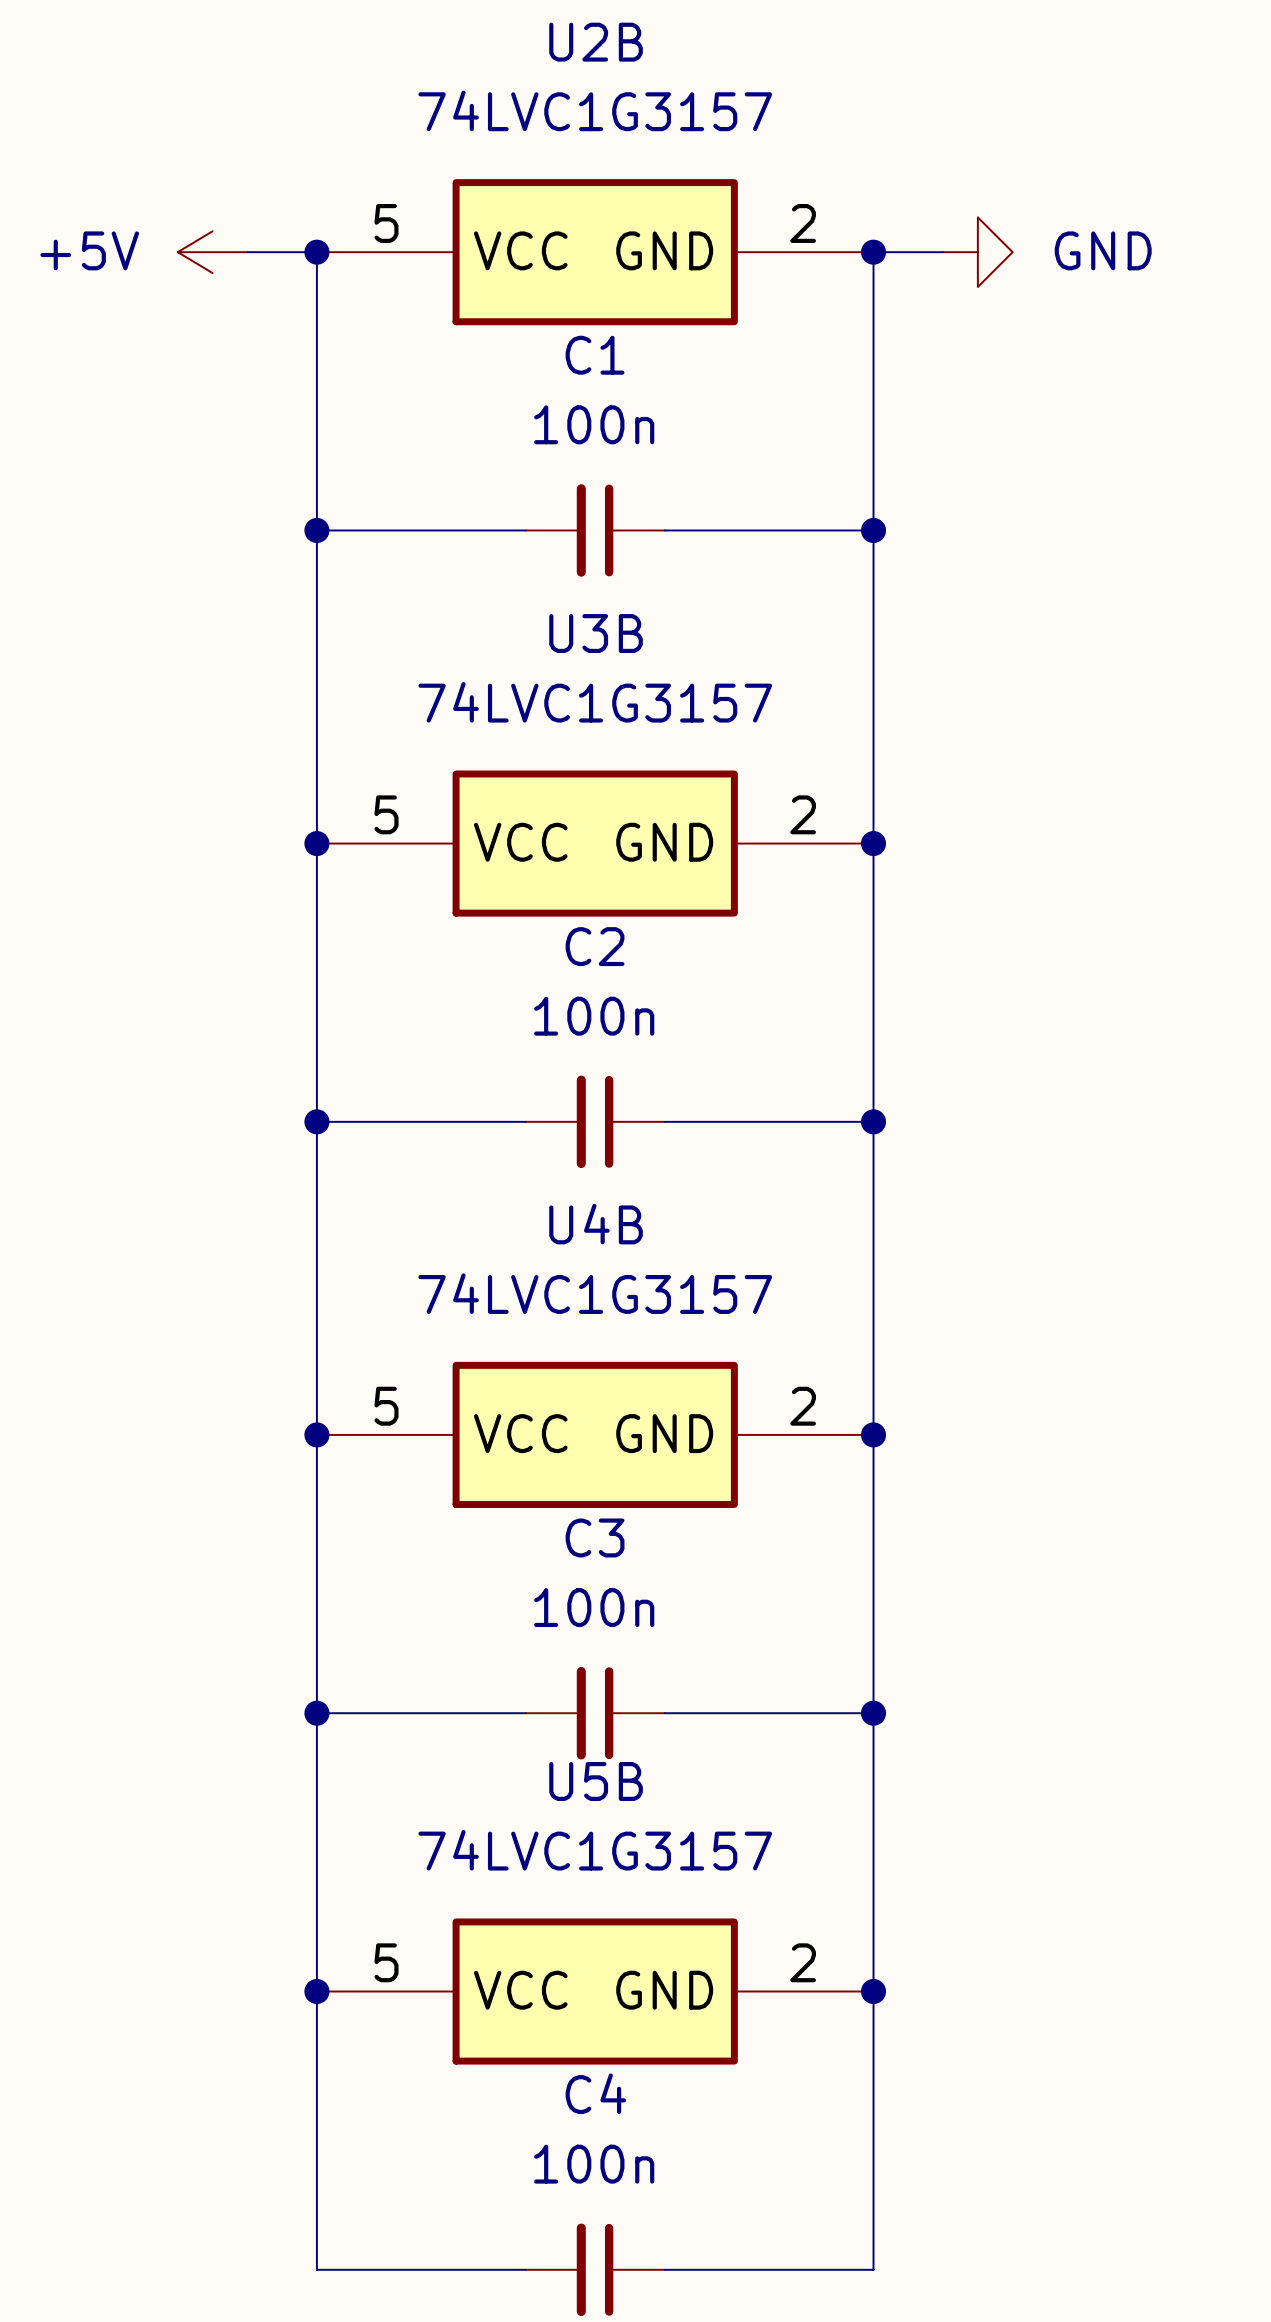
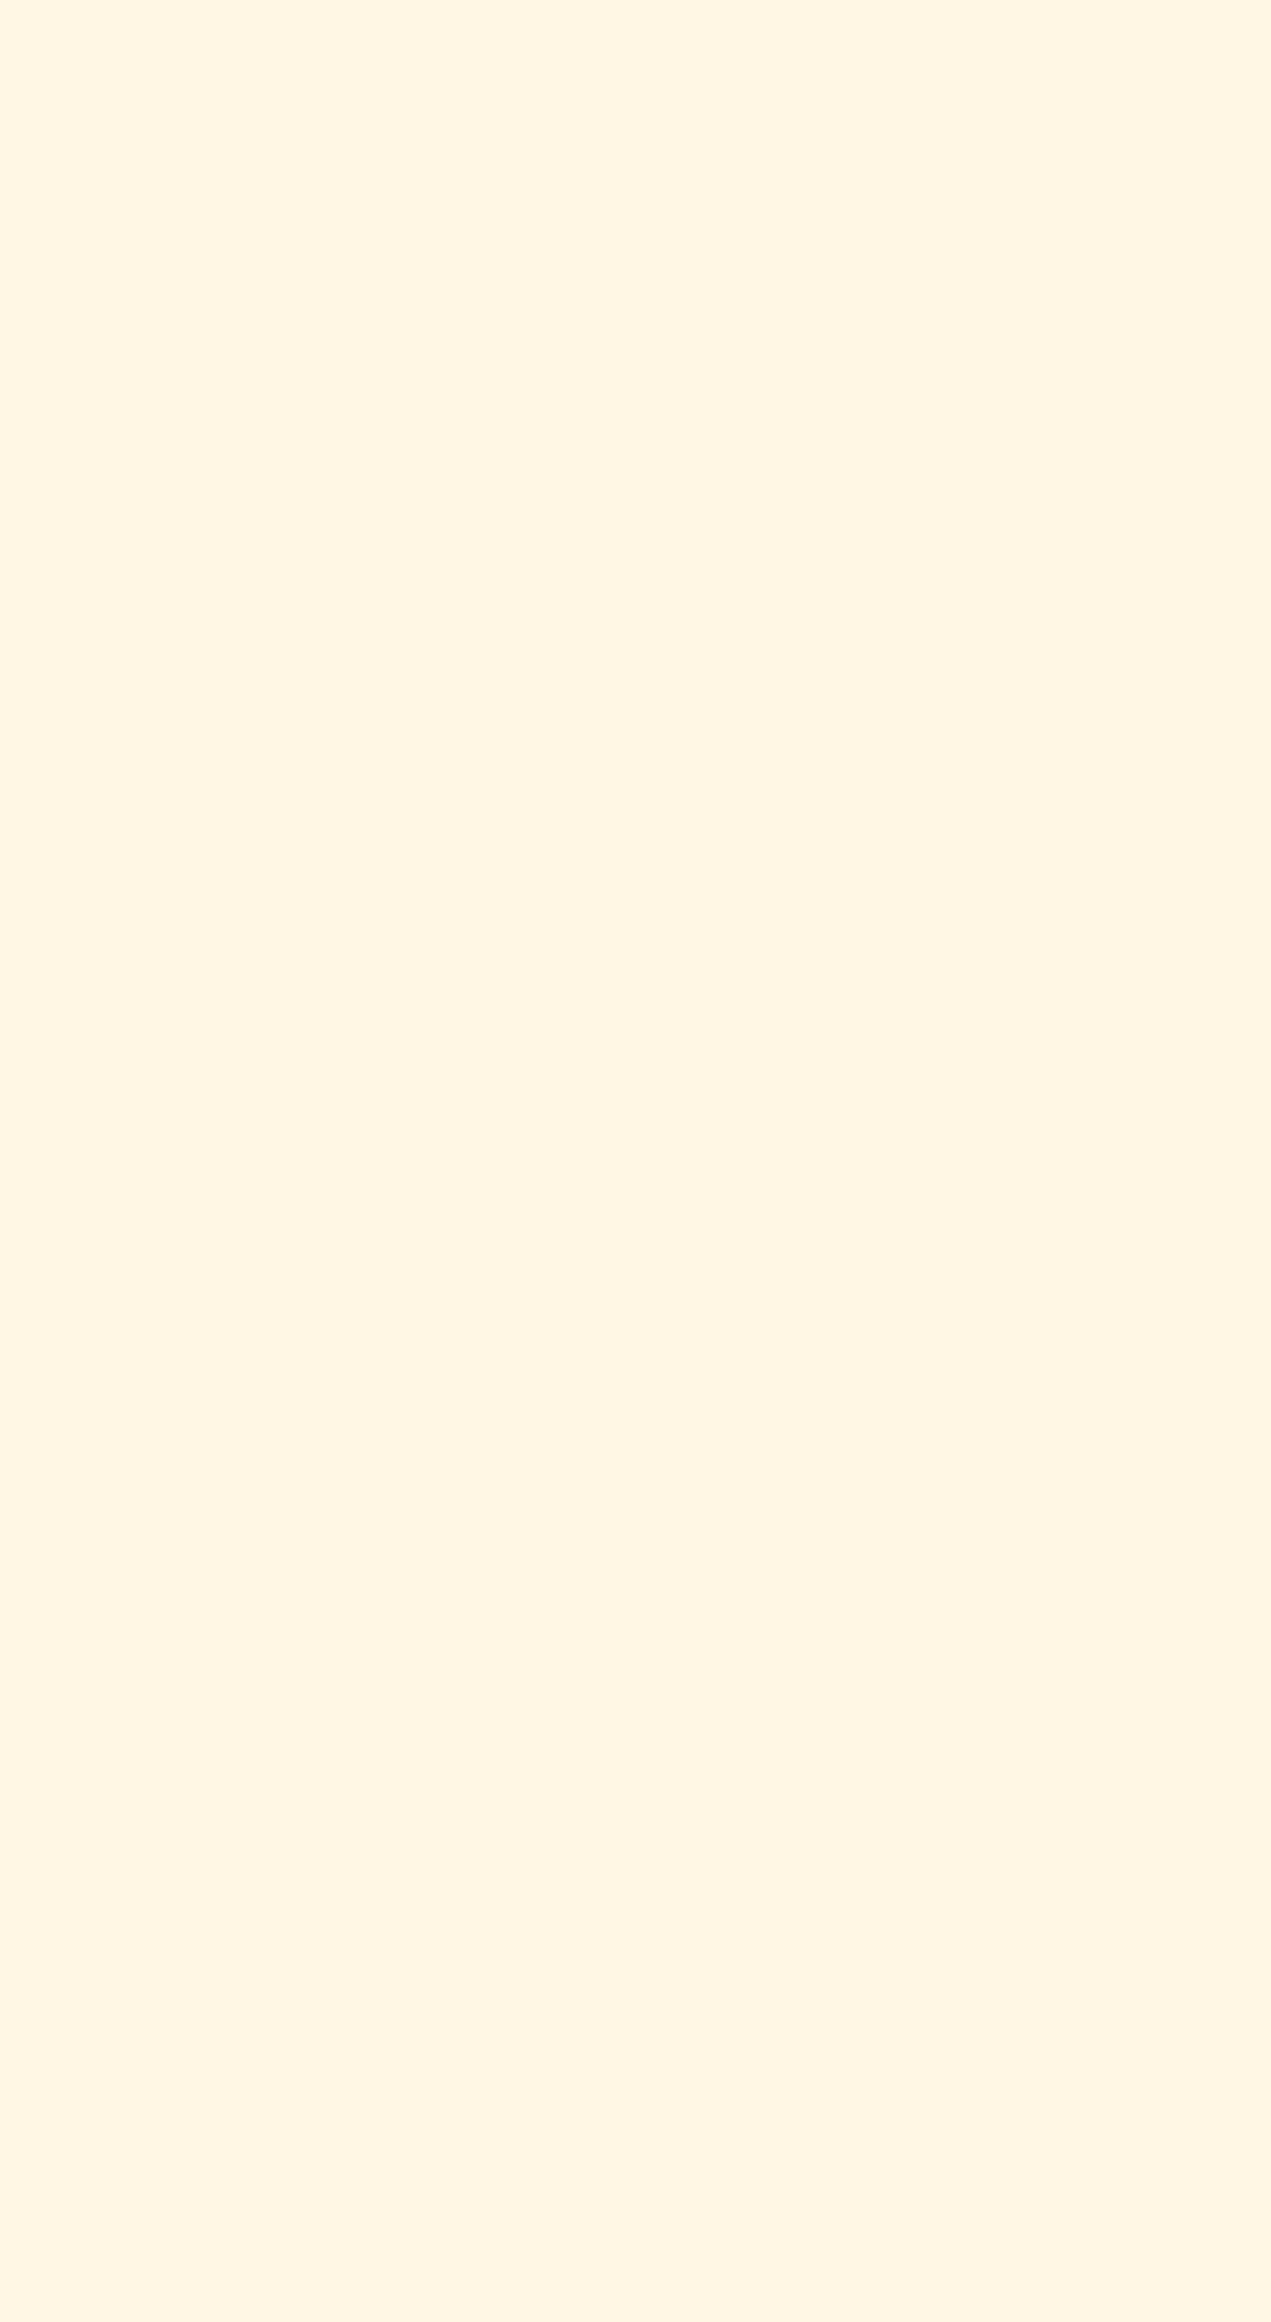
power symbol: +5V (212, 252) -> none
wire: (247, 252) (316, 252) (316, 2269) (525, 2269) -> none
junction: (316, 252) -> none
U2B: 74LVC1G3157 (595, 252) -> none
junction: (873, 252) -> none
wire: (943, 252) (873, 252) (873, 2269) (664, 2269) -> none
power symbol: GND (977, 252) -> none
wire: (316, 530) (525, 530) -> none
junction: (316, 530) -> none
C1: 100n (595, 530) -> none
wire: (664, 530) (873, 530) -> none
junction: (873, 530) -> none
junction: (316, 843) -> none
U3B: 74LVC1G3157 (595, 843) -> none
junction: (873, 843) -> none
wire: (316, 1121) (525, 1121) -> none
junction: (316, 1121) -> none
C2: 100n (595, 1121) -> none
wire: (664, 1121) (873, 1121) -> none
junction: (873, 1121) -> none
junction: (316, 1434) -> none
U4B: 74LVC1G3157 (595, 1434) -> none
junction: (873, 1434) -> none
wire: (316, 1713) (525, 1713) -> none
junction: (316, 1713) -> none
C3: 100n (595, 1713) -> none
wire: (664, 1713) (873, 1713) -> none
junction: (873, 1713) -> none
junction: (316, 1991) -> none
U5B: 74LVC1G3157 (595, 1991) -> none
junction: (873, 1991) -> none
C4: 100n (595, 2269) -> none

